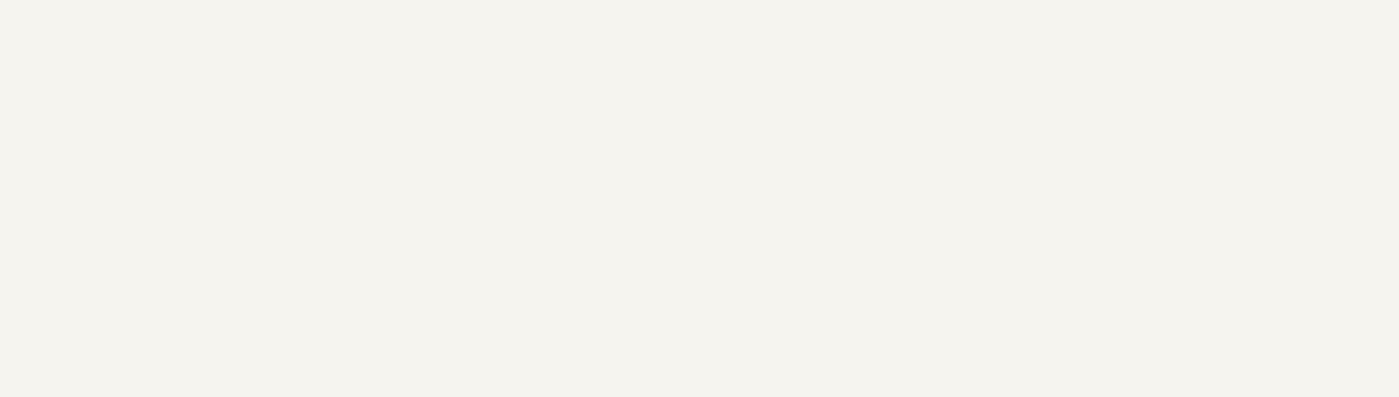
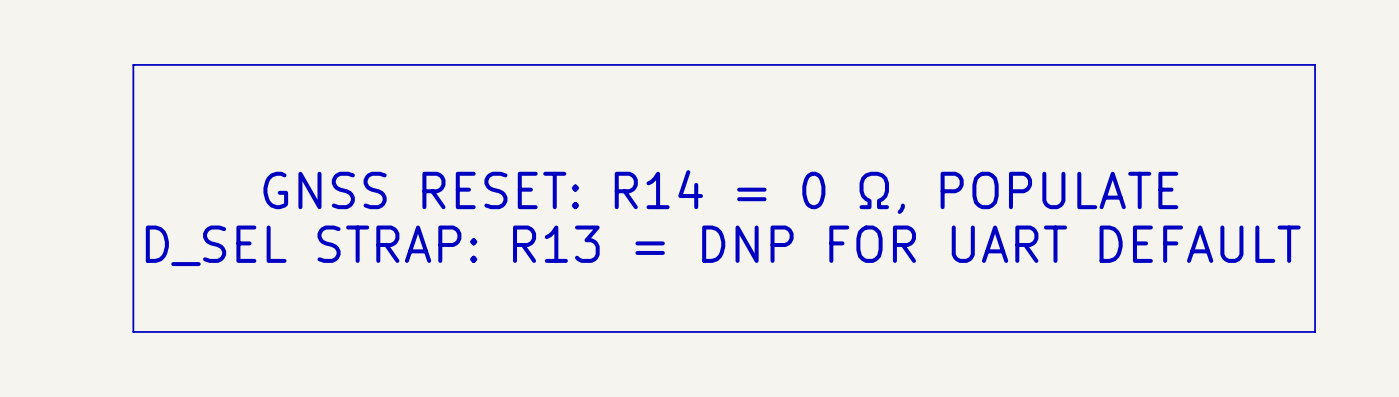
line: none -> (133, 64) (1315, 64) (1315, 331) (133, 331) (133, 64)
text: none -> GNSS RESET: R14 = 0 Ω, POPULATE (720, 192)
text: none -> D_SEL STRAP: R13 = DNP FOR UART DEFAULT (723, 245)

